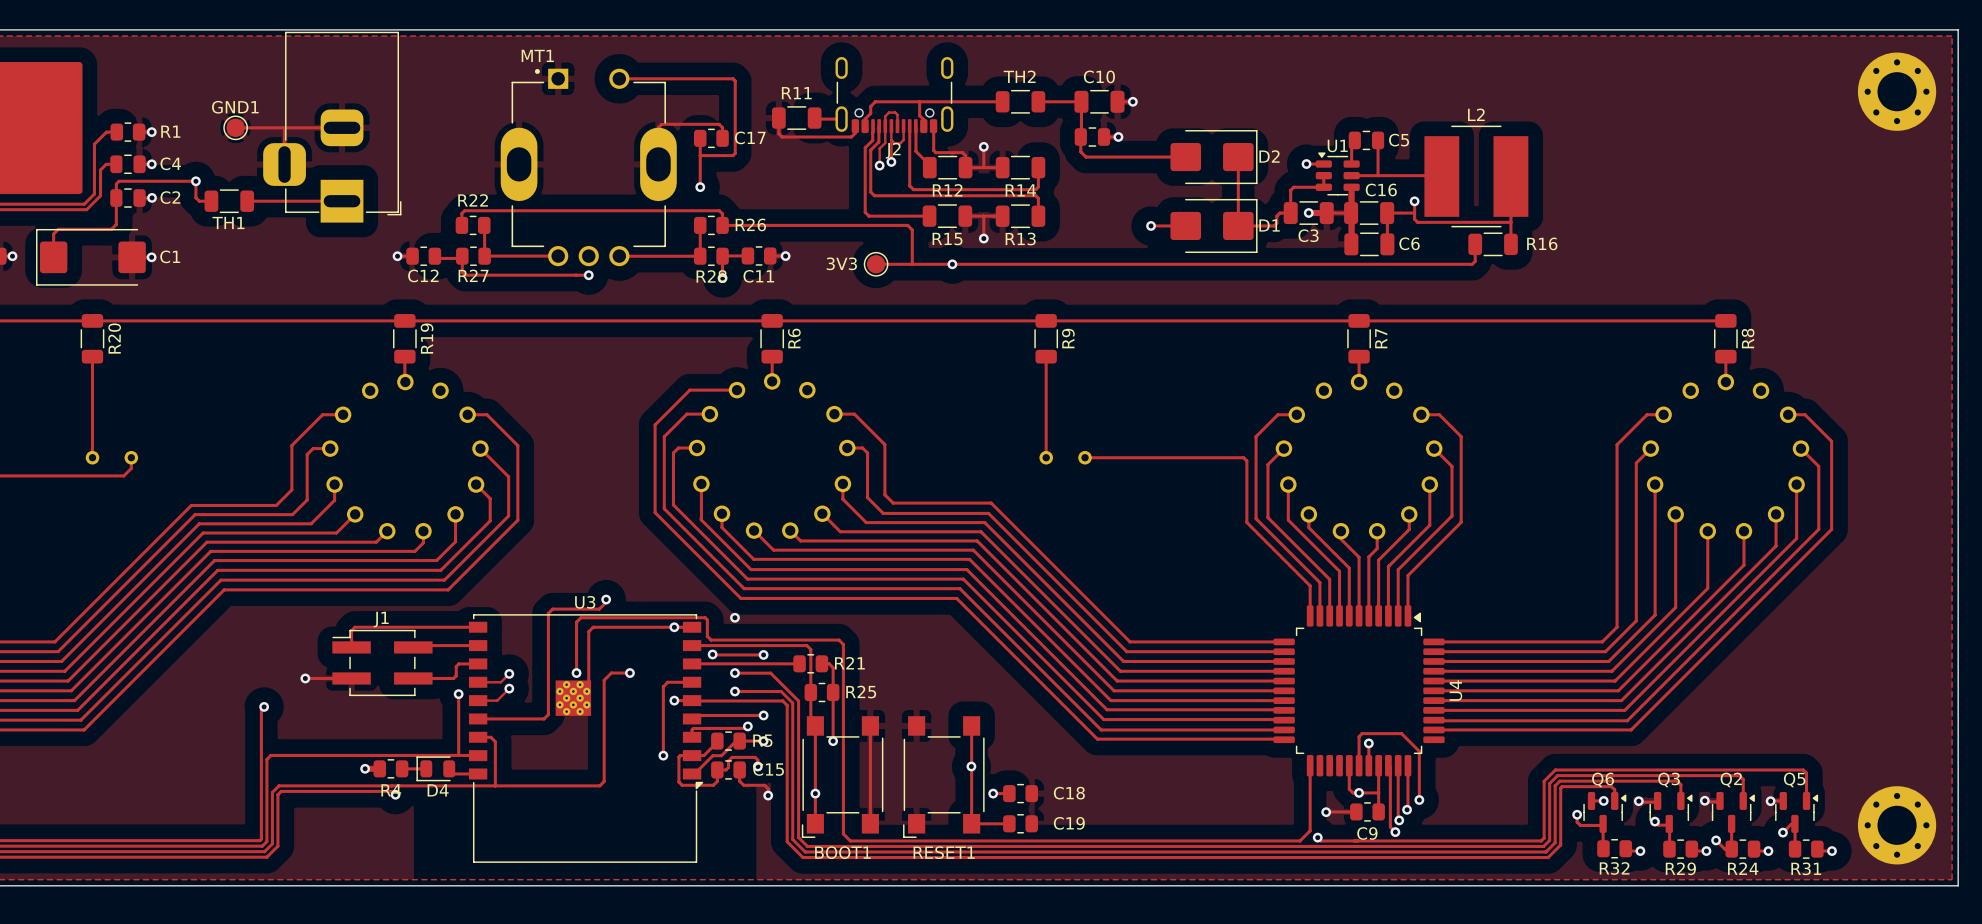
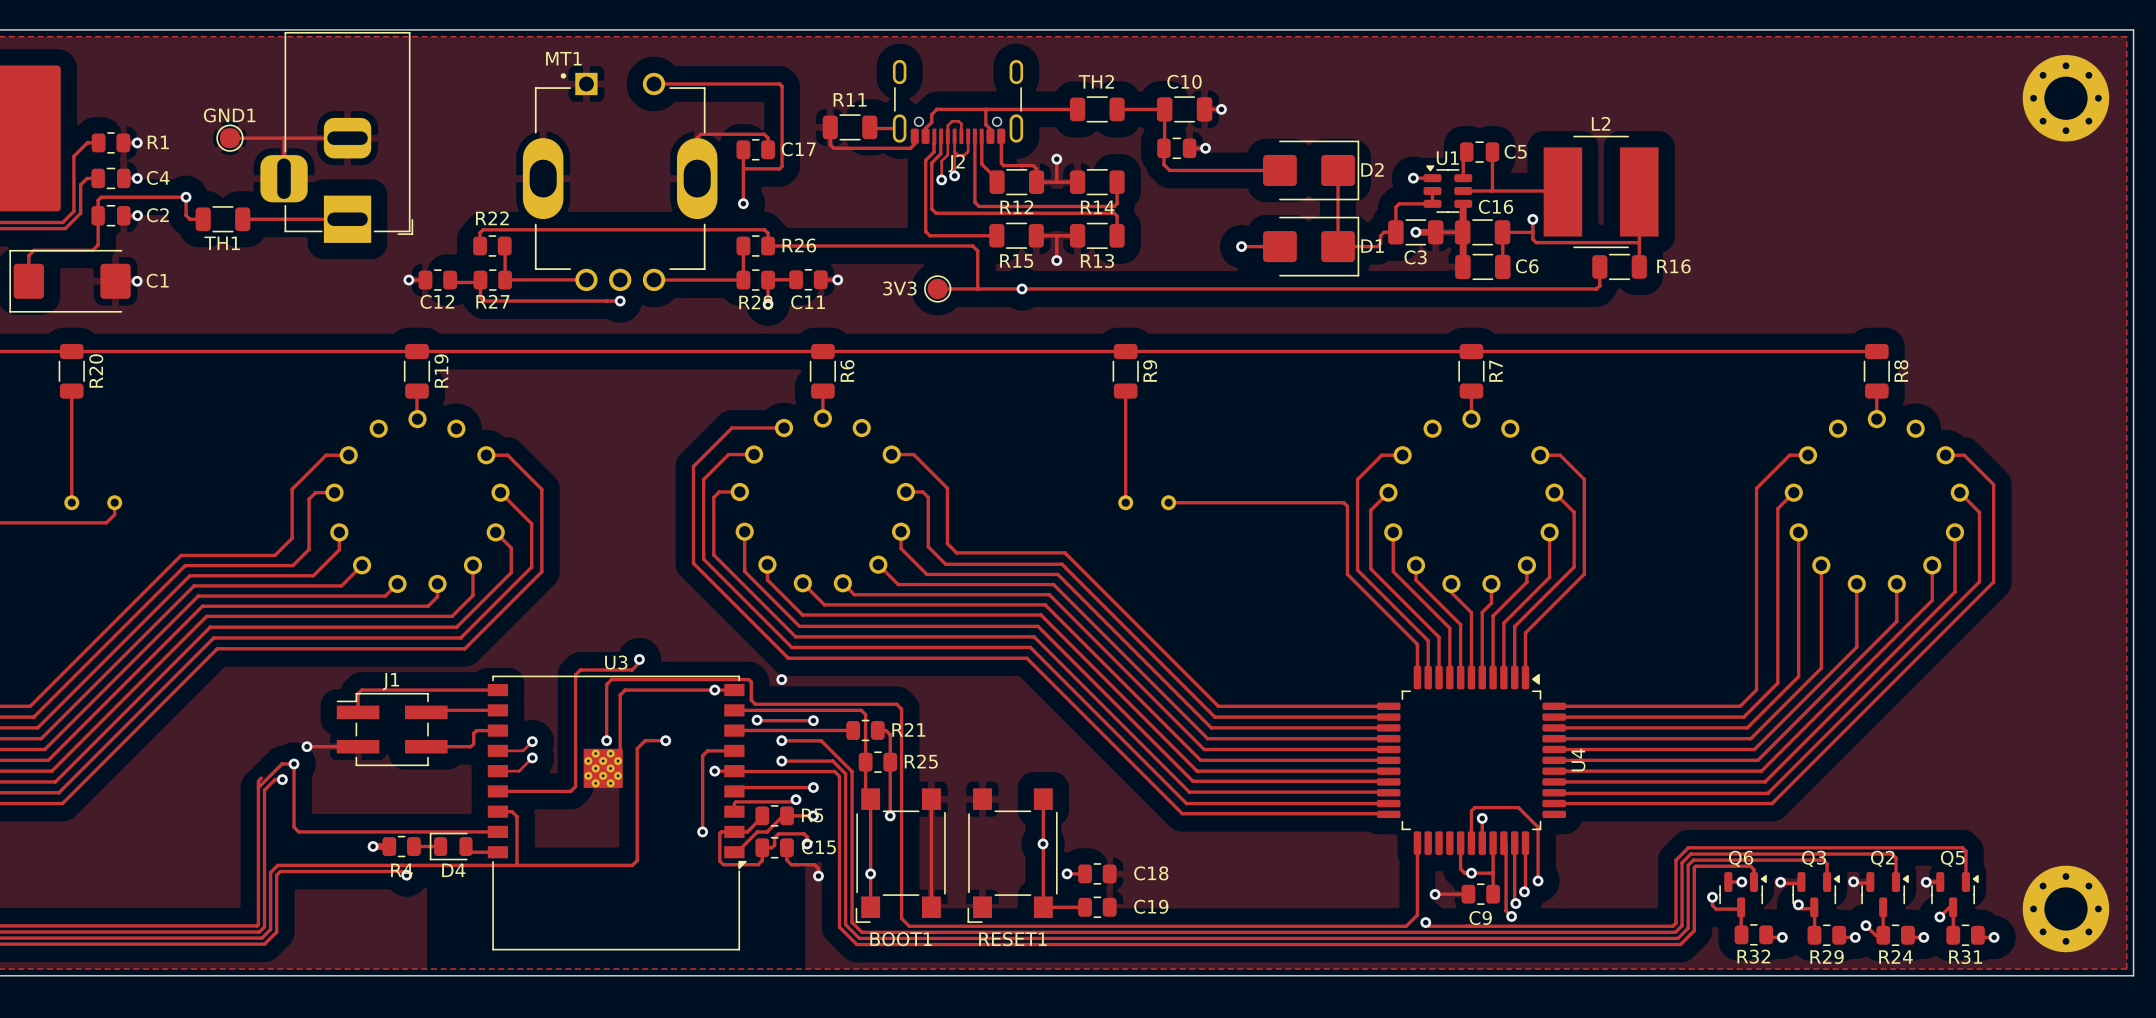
via: none -> (294, 763)
track: (458, 694) (458, 755) -> none
via: (458, 694) -> none
via: (264, 706) -> none
track: none -> (282, 779) (275, 779) (264, 790) (264, 836)
via: none -> (282, 779)
track: (478, 755) (270, 755) (266, 759) -> (497, 831) (298, 831) (294, 827) (294, 763) (282, 763) (258, 787)

